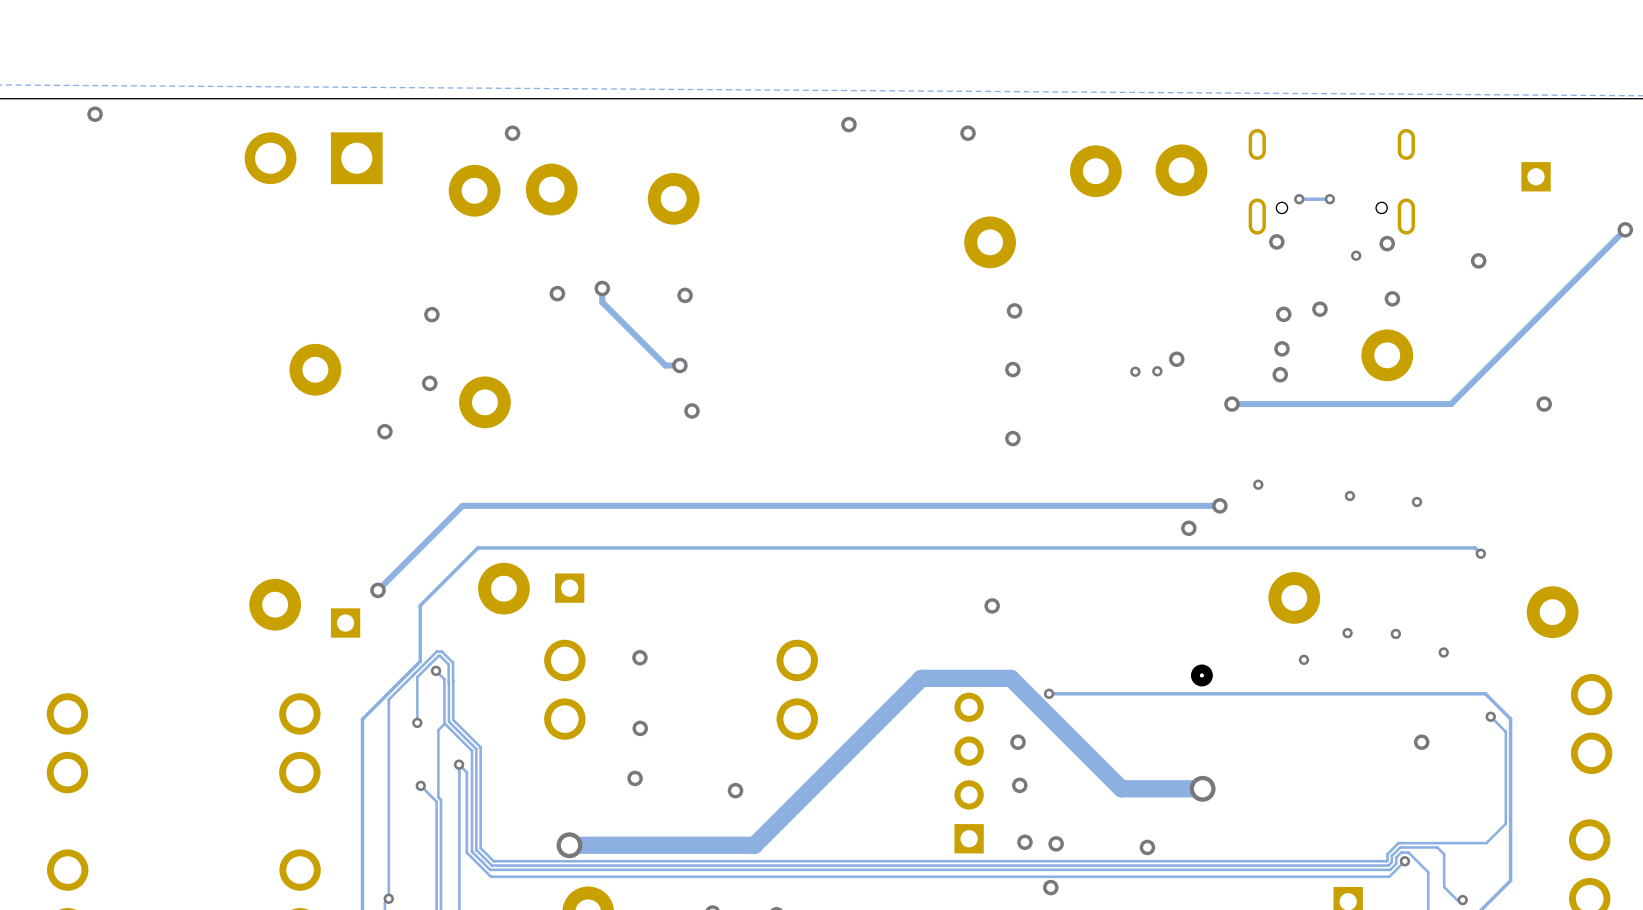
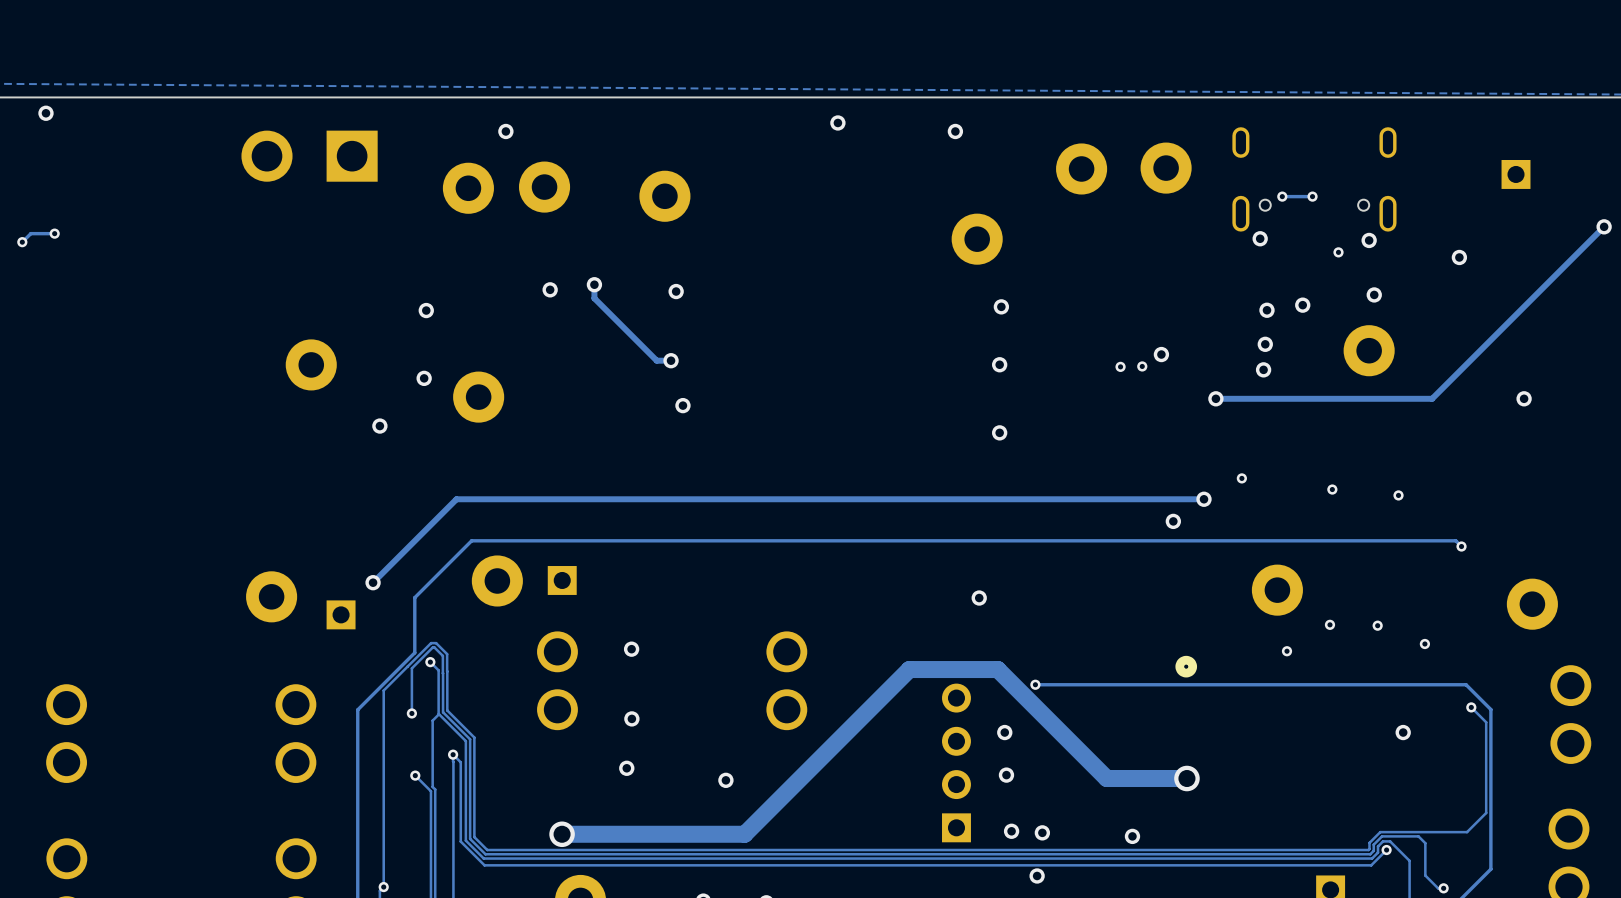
via position: (95, 114) -> (45, 113)
track: none -> (54, 233) (30, 233) (22, 242)
via: none -> (54, 233)
via: none -> (22, 242)

